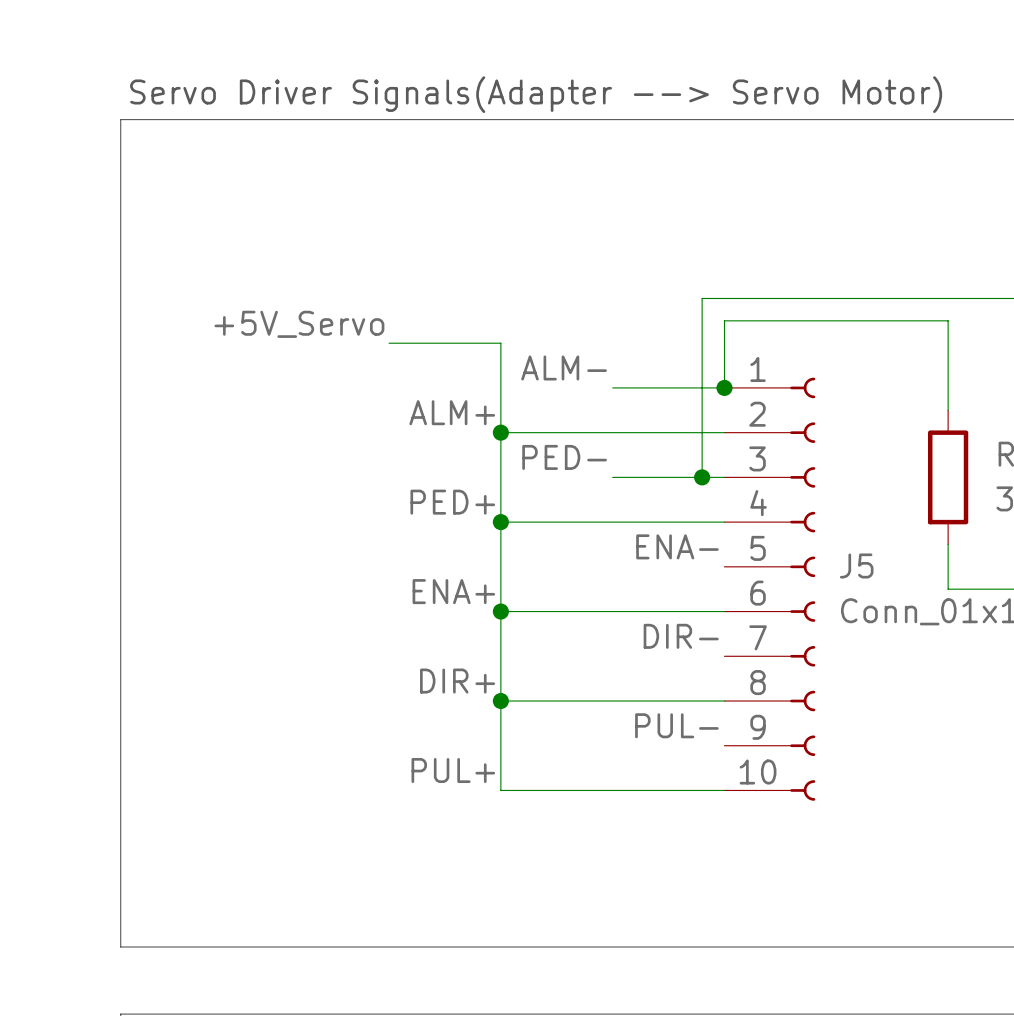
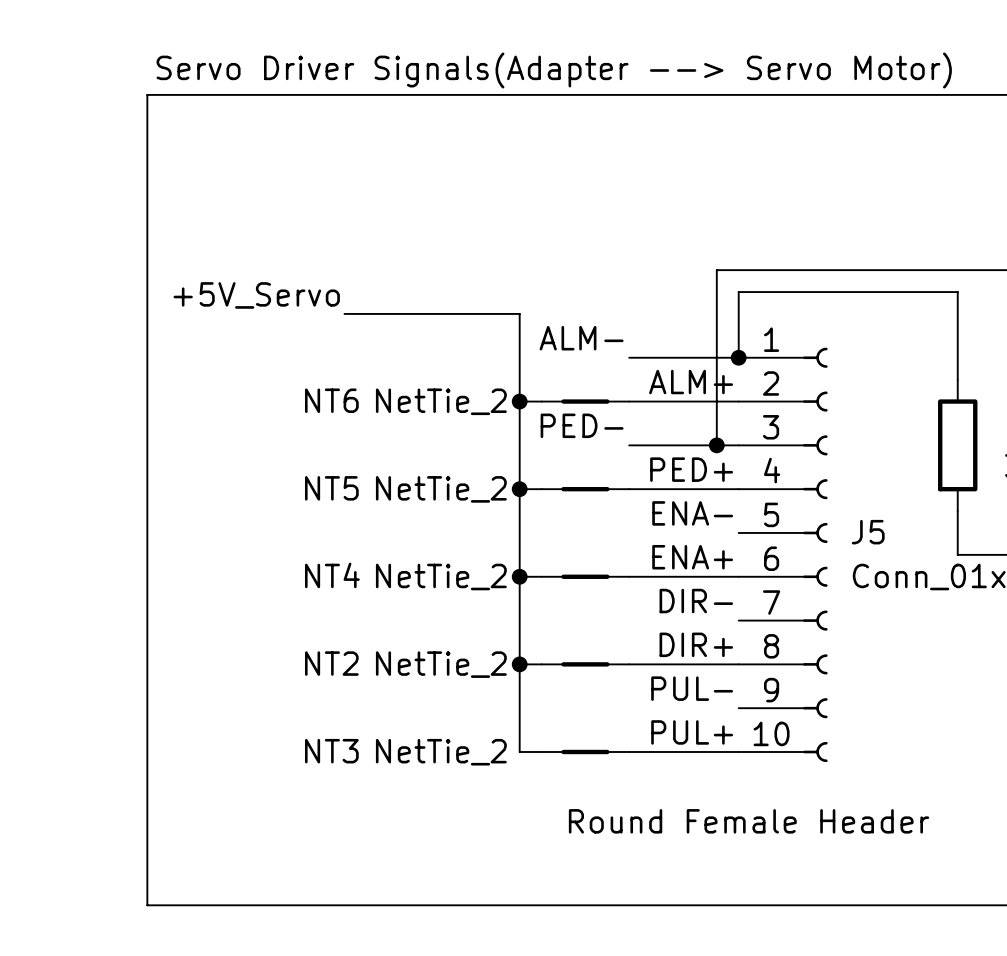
label position: +5V_Servo (299, 324) -> +5V_Servo (256, 295)
wire: none -> (344, 313) (410, 313)
label position: ALM+ (452, 412) -> ALM+ (691, 382)
NT6: none -> NetTie_2 (585, 401)
label position: PED+ (452, 502) -> PED+ (691, 469)
NT5: none -> NetTie_2 (585, 489)
label position: ENA+ (453, 591) -> ENA+ (692, 557)
NT4: none -> NetTie_2 (585, 576)
label position: DIR+ (457, 681) -> DIR+ (696, 644)
NT2: none -> NetTie_2 (585, 664)
label position: PUL+ (453, 770) -> PUL+ (692, 732)
NT3: none -> NetTie_2 (585, 751)
text: none -> Round Female Header (749, 821)

